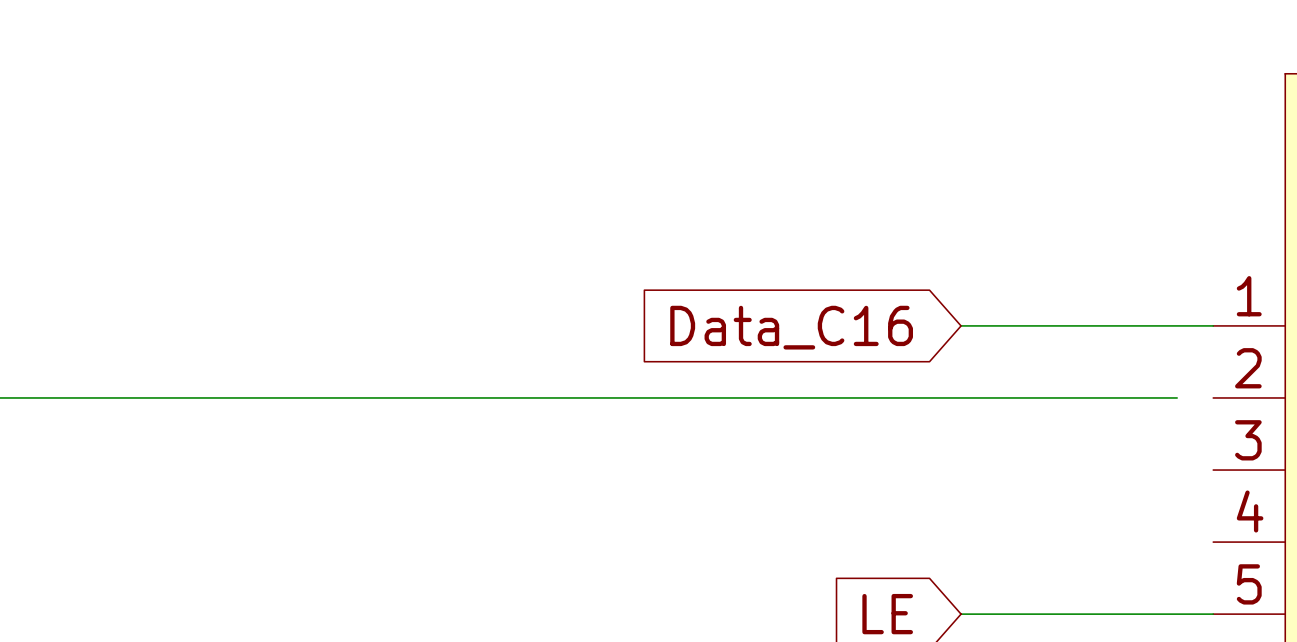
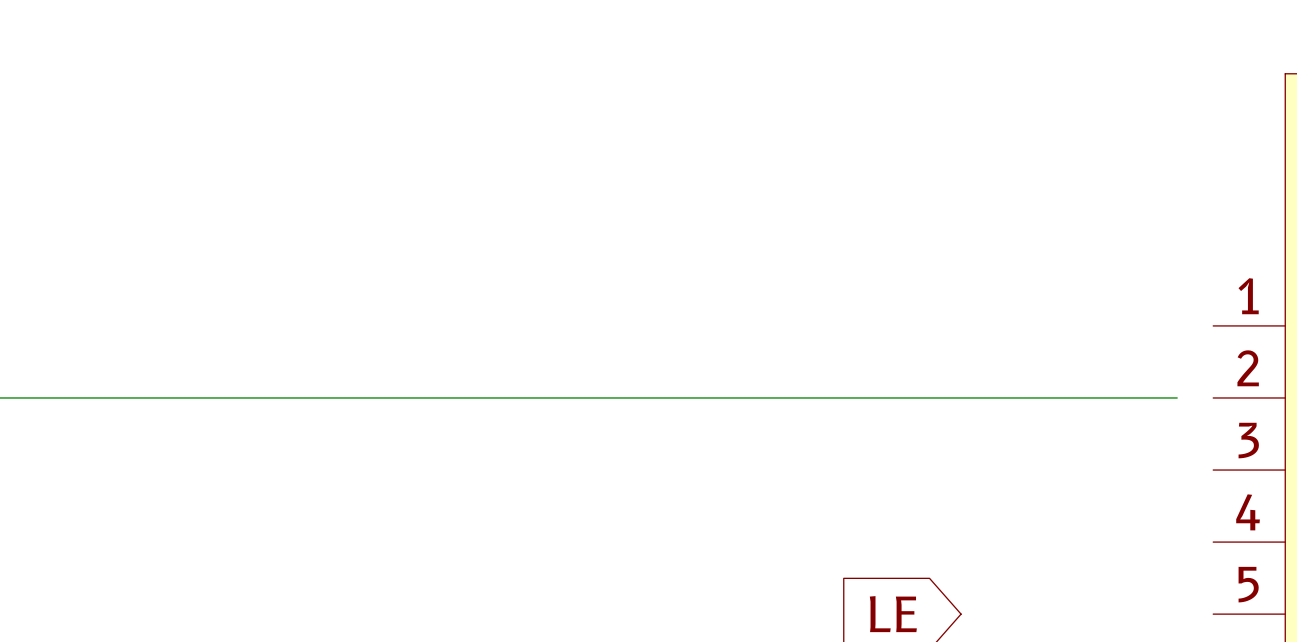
wire: (961, 325) (1213, 325) -> none
global label: Data_C16 (791, 327) -> none
wire: (961, 614) (1213, 614) -> none

